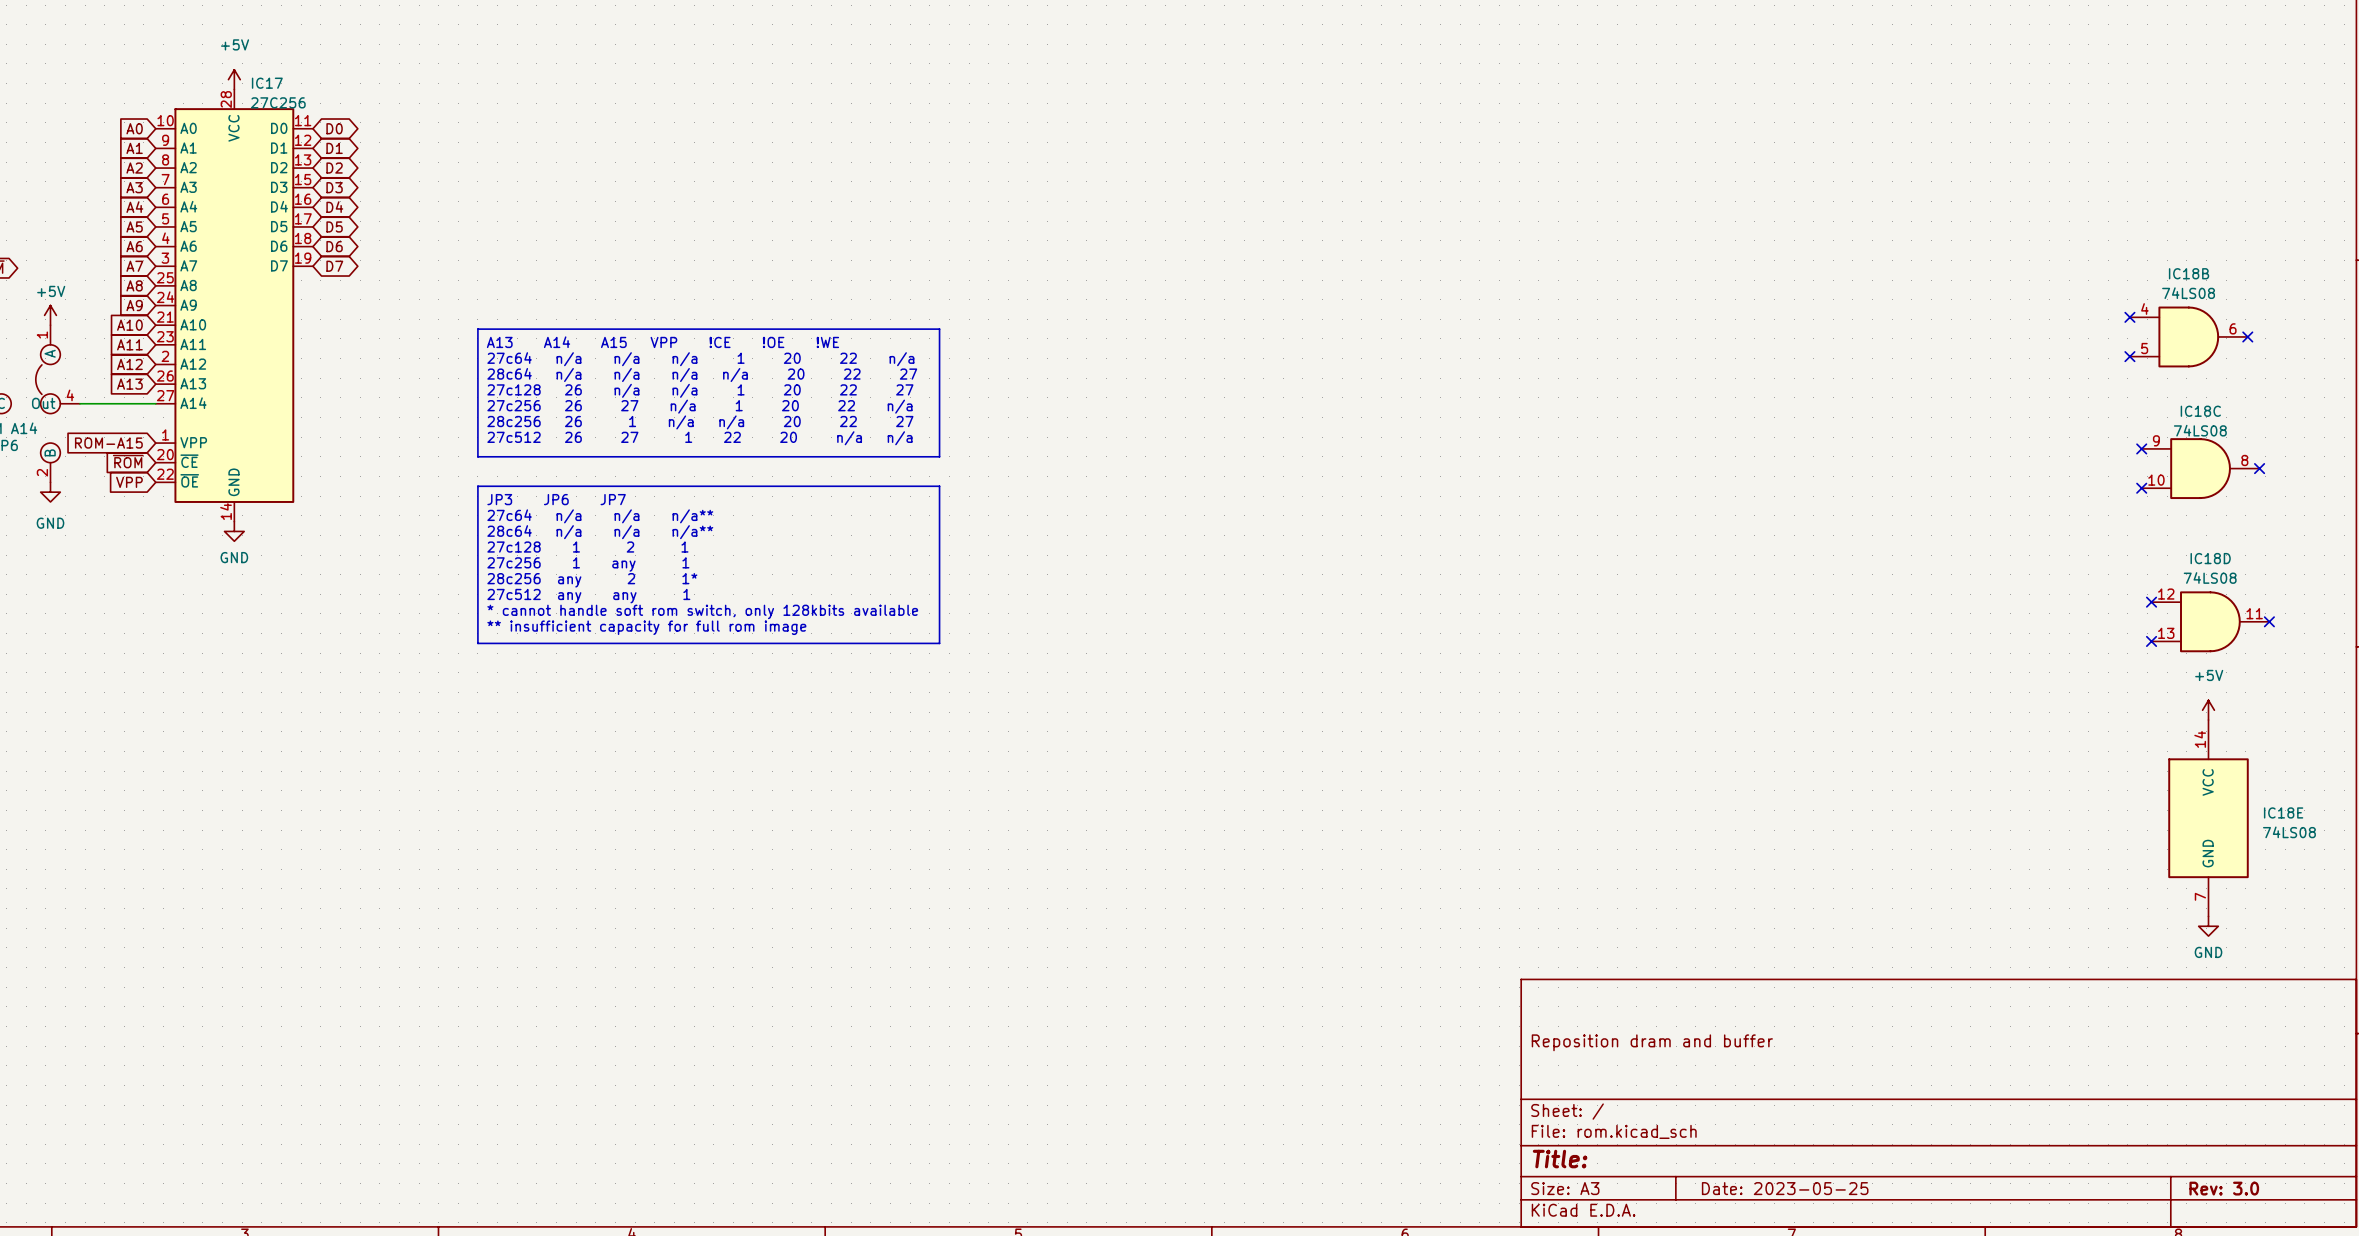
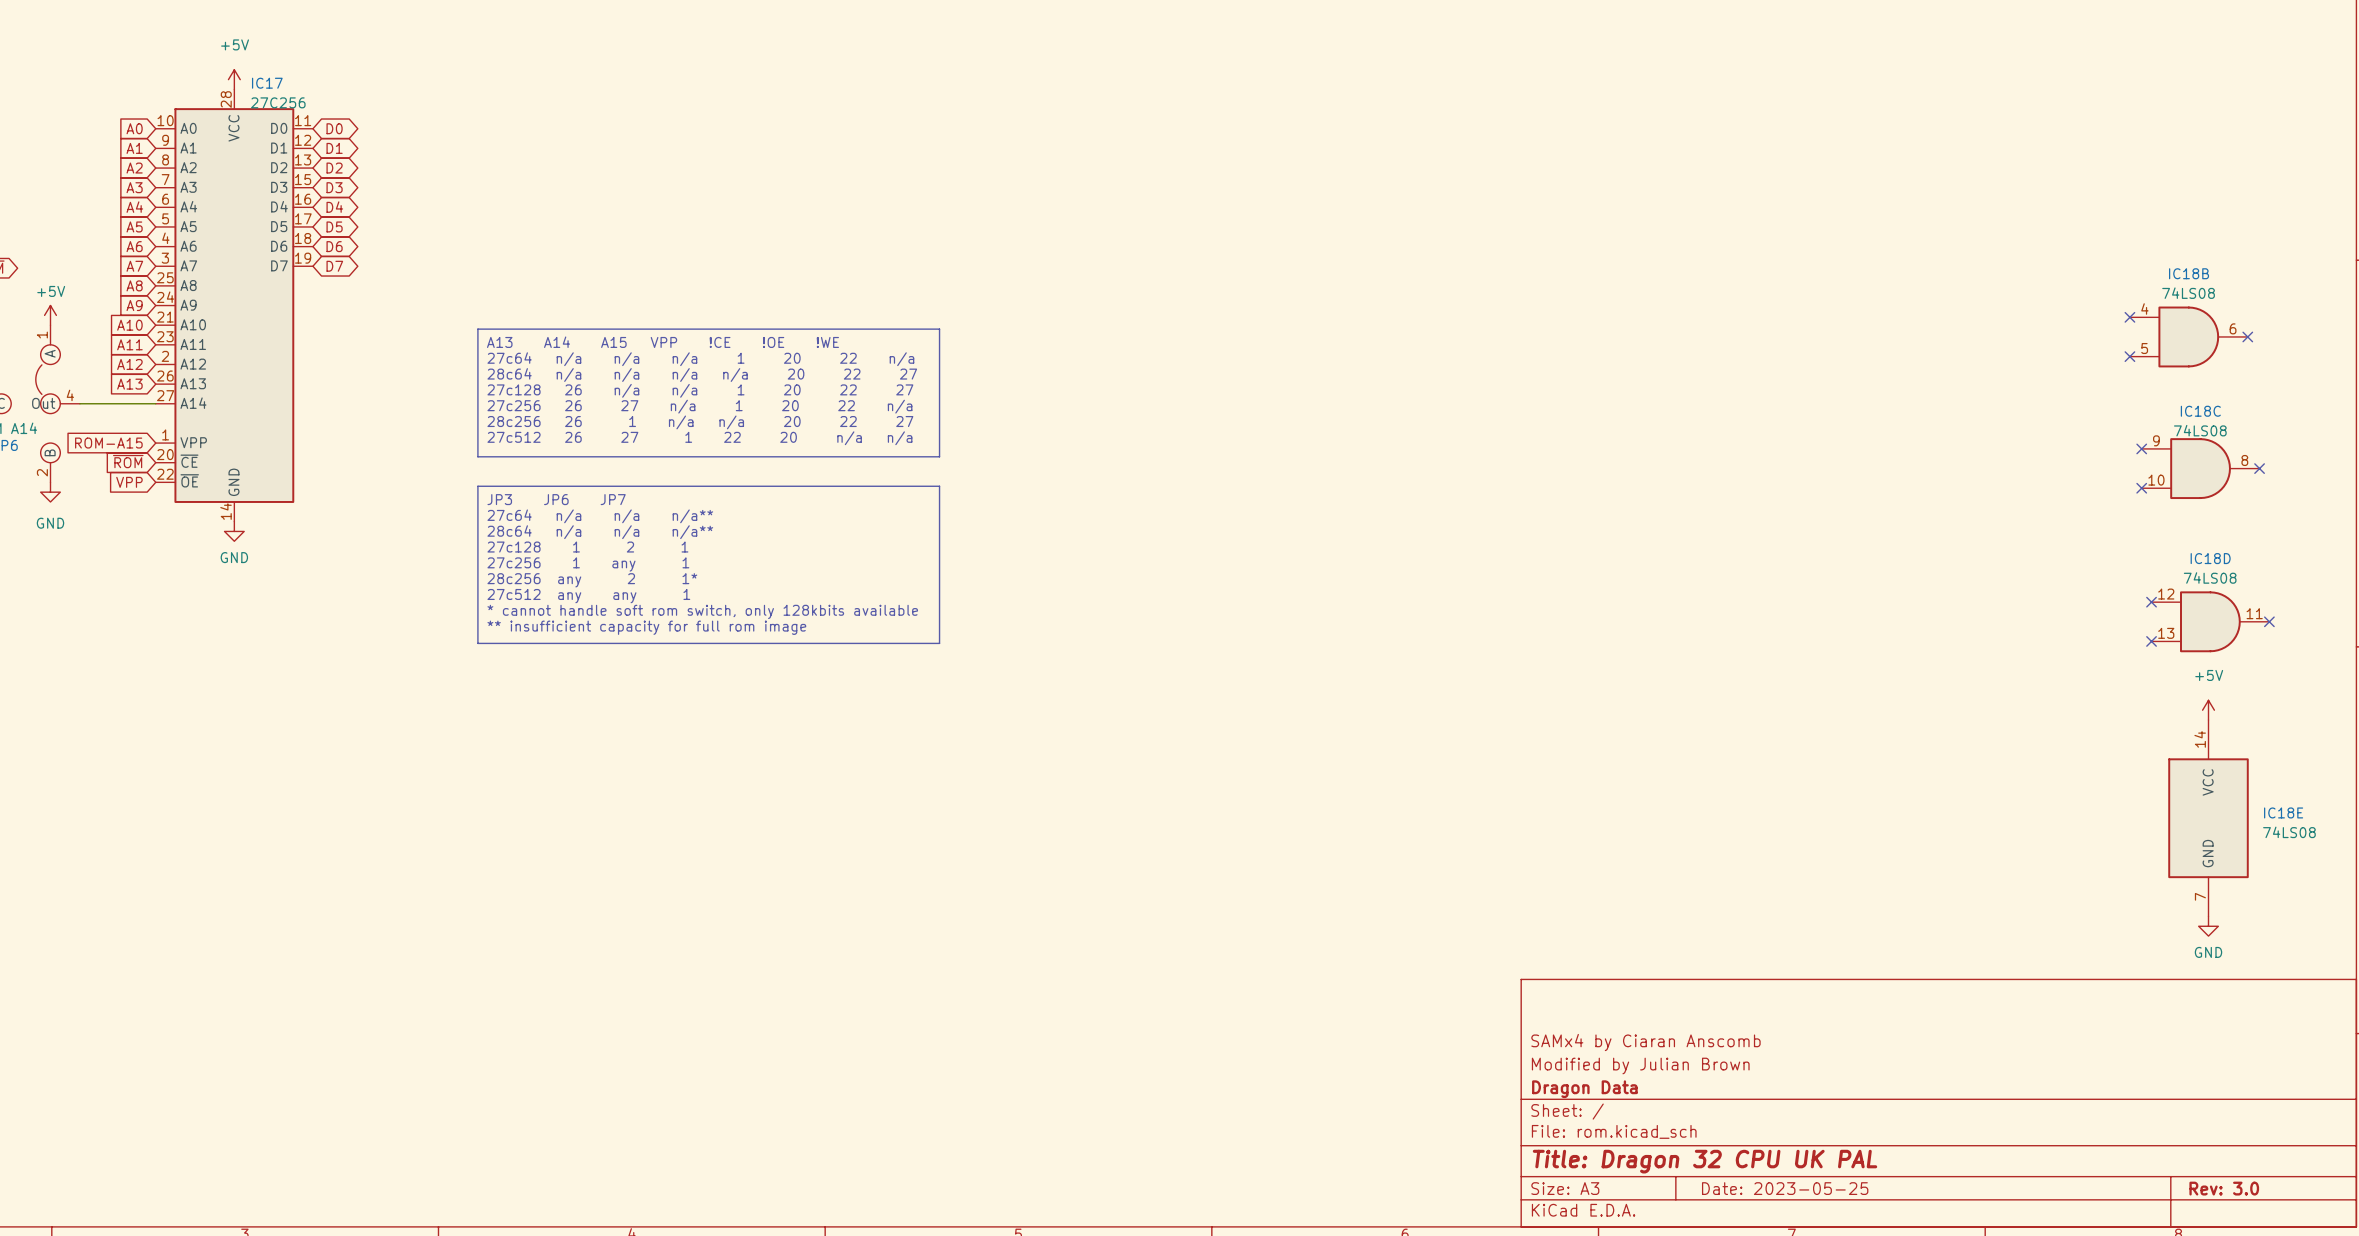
title block: Reposition dram and buffer (1652, 1042) -> SAMx4 by Ciaran Anscomb (1645, 1042)
title block: none -> Modified by Julian Brown (1640, 1066)
title block: none -> Dragon Data (1584, 1089)
title block: Title: (1560, 1159) -> Title: Dragon 32 CPU UK PAL (1705, 1161)

